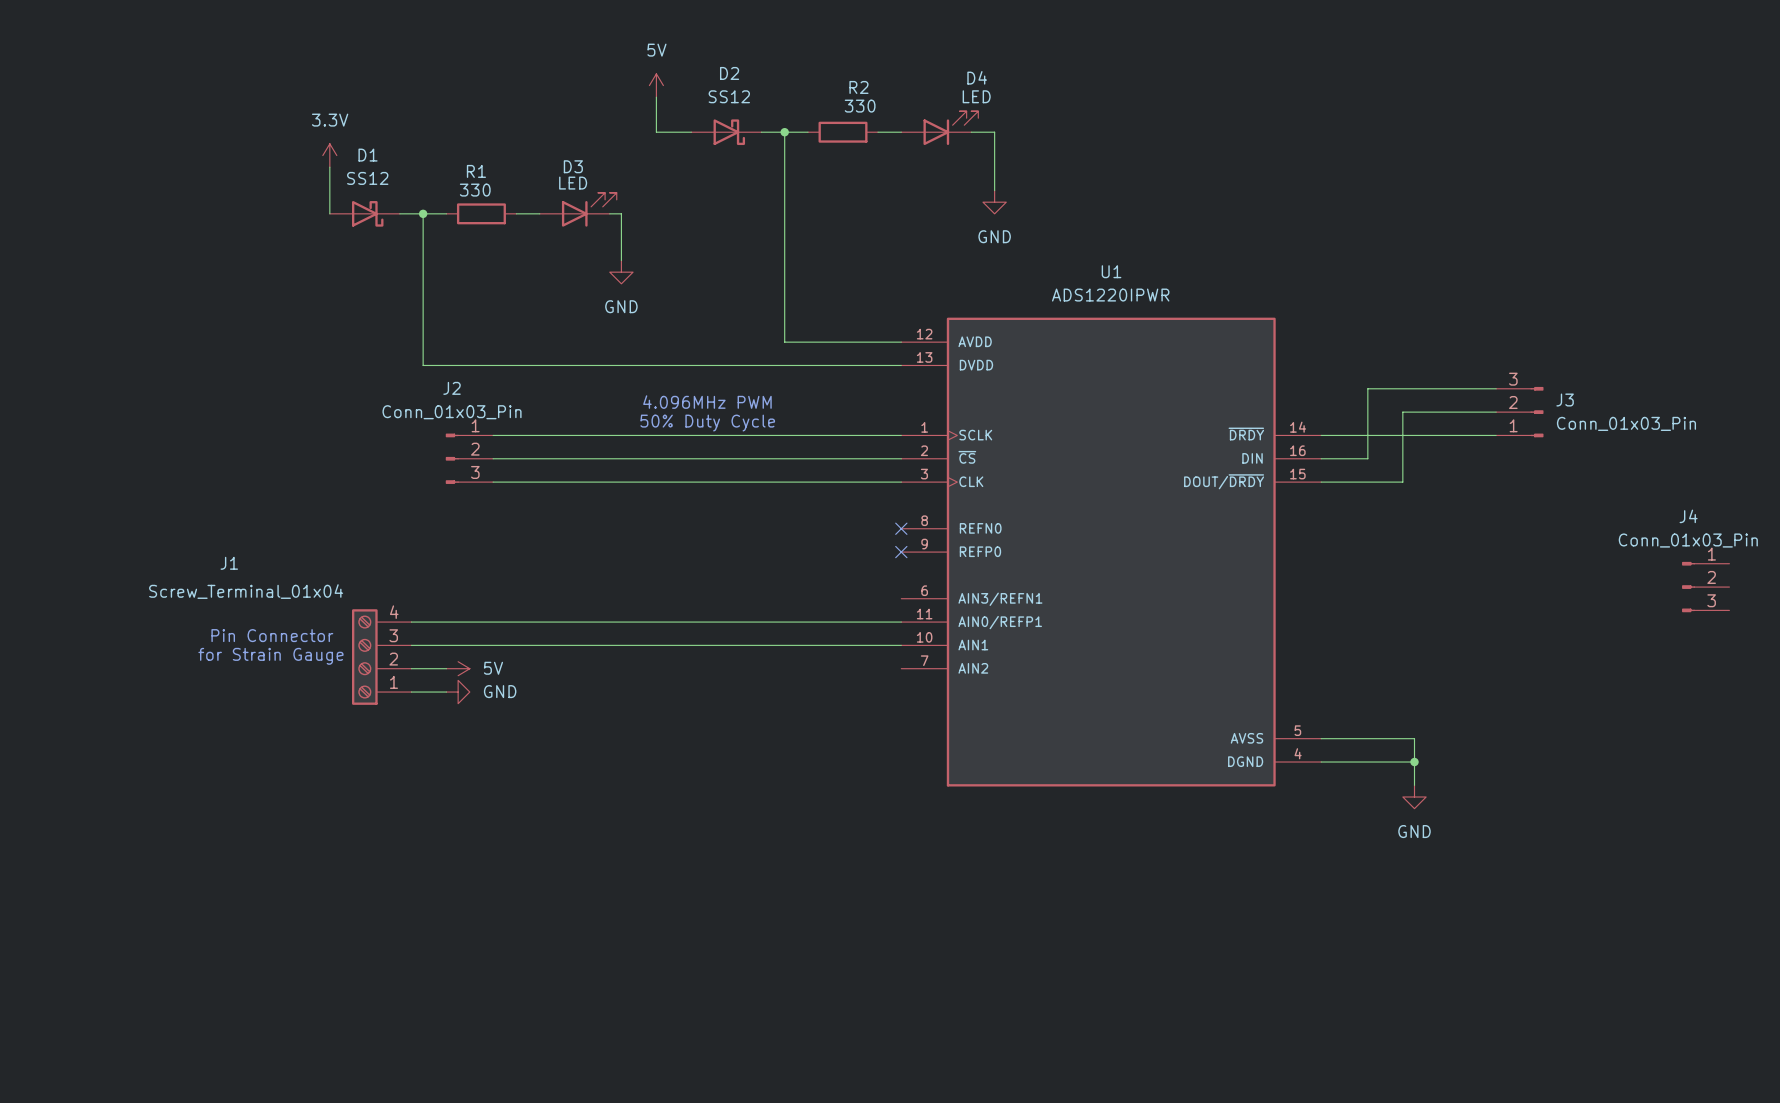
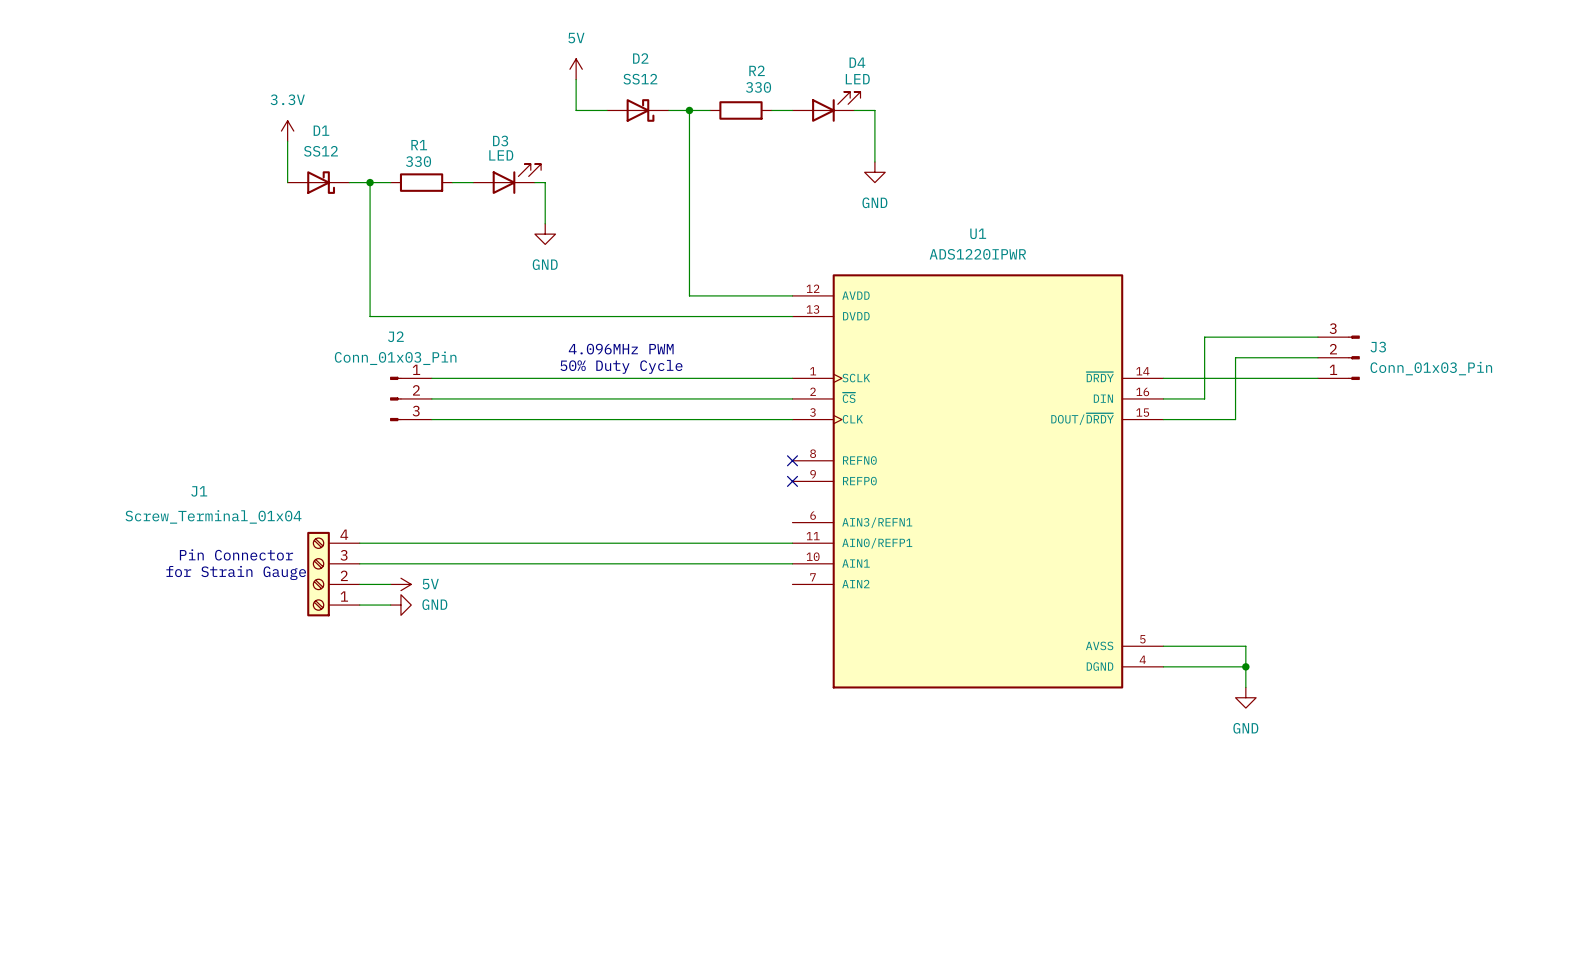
J4: Conn_01x03_Pin (1705, 587) -> none

